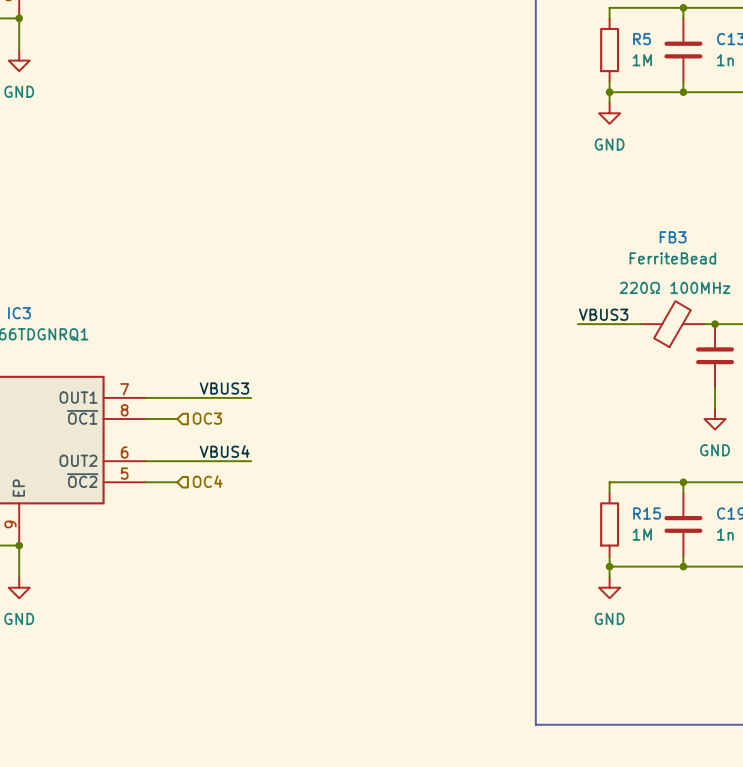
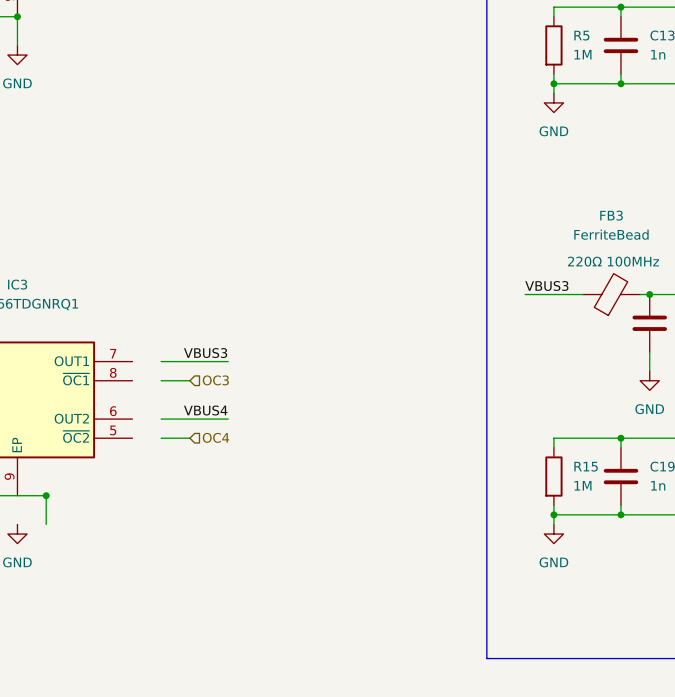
wire: (145, 397) (177, 397) -> none
hierarchical label position: OC3 (207, 418) -> OC3 (215, 380)
wire: (145, 419) (177, 419) -> (189, 380) (161, 380)
wire: (145, 461) (177, 461) -> none
hierarchical label position: OC4 (207, 481) -> OC4 (216, 437)
wire: (145, 482) (177, 482) -> (189, 438) (161, 438)
wire: (19, 545) (19, 577) -> (17, 495) (46, 495) (46, 524)
junction position: (19, 545) -> (46, 495)

